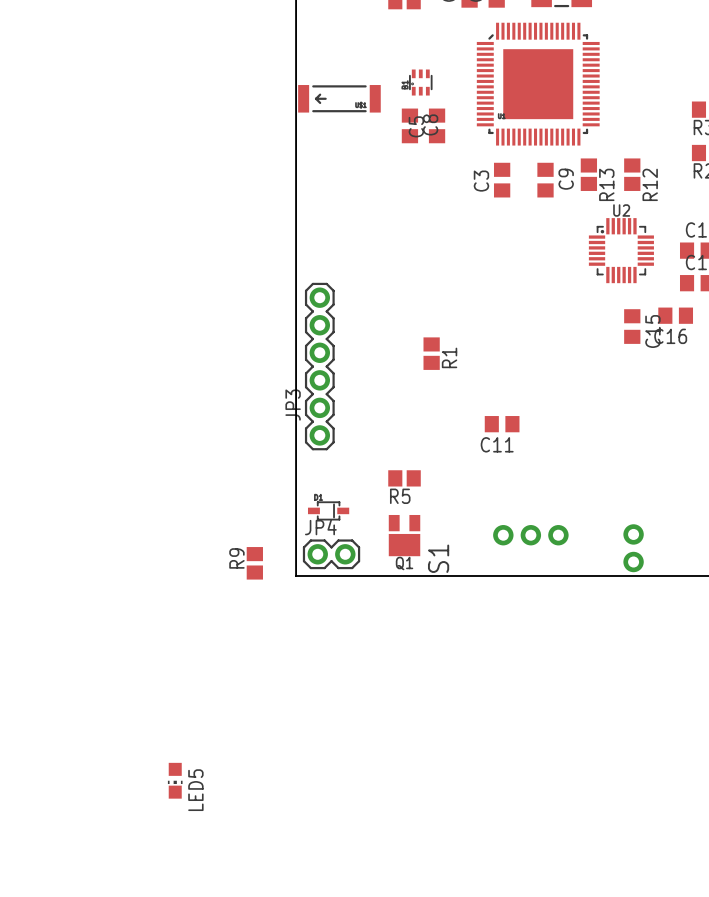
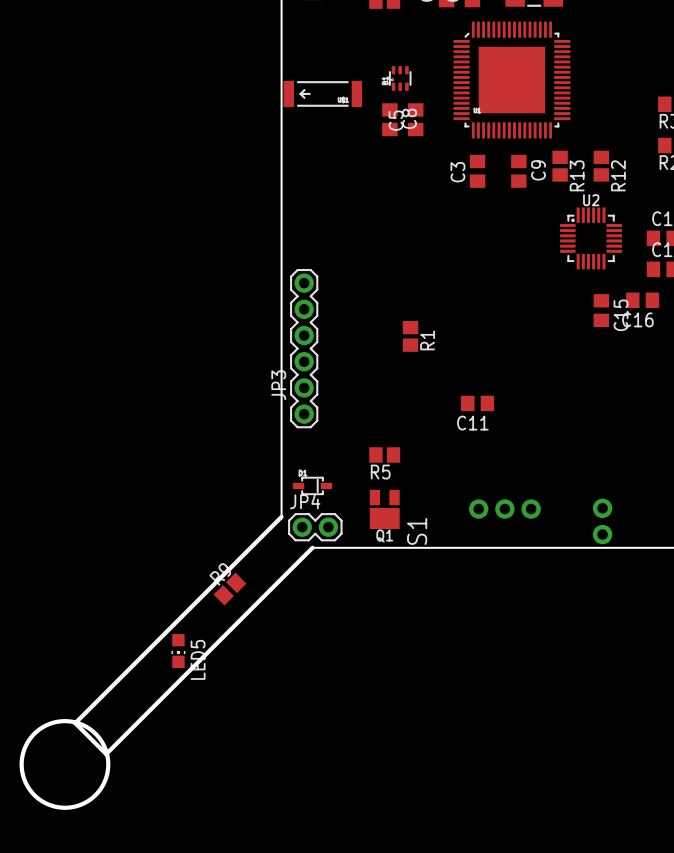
board edge: (296, 543) (296, 575) (328, 575) -> (281, 516) (75, 723) (106, 754) (312, 547)
R9 rotation: 0° (254, 563) -> 45° clockwise (230, 589)
R9 position: (254, 563) -> (230, 589)
round board edge: none -> [19, 719, 111, 810]
LED5 position: (175, 780) -> (178, 650)

